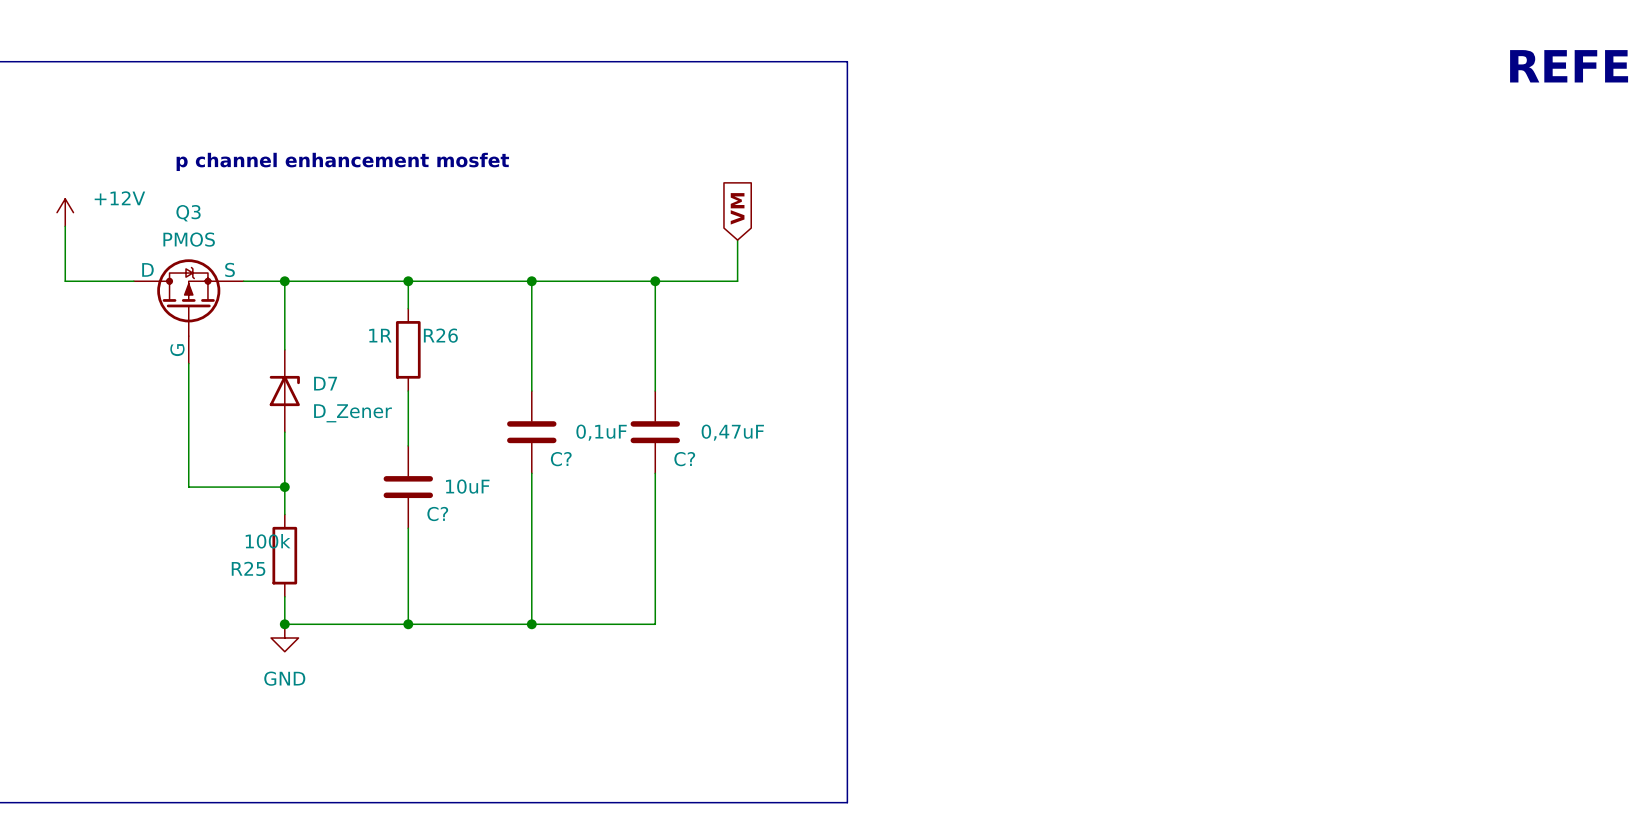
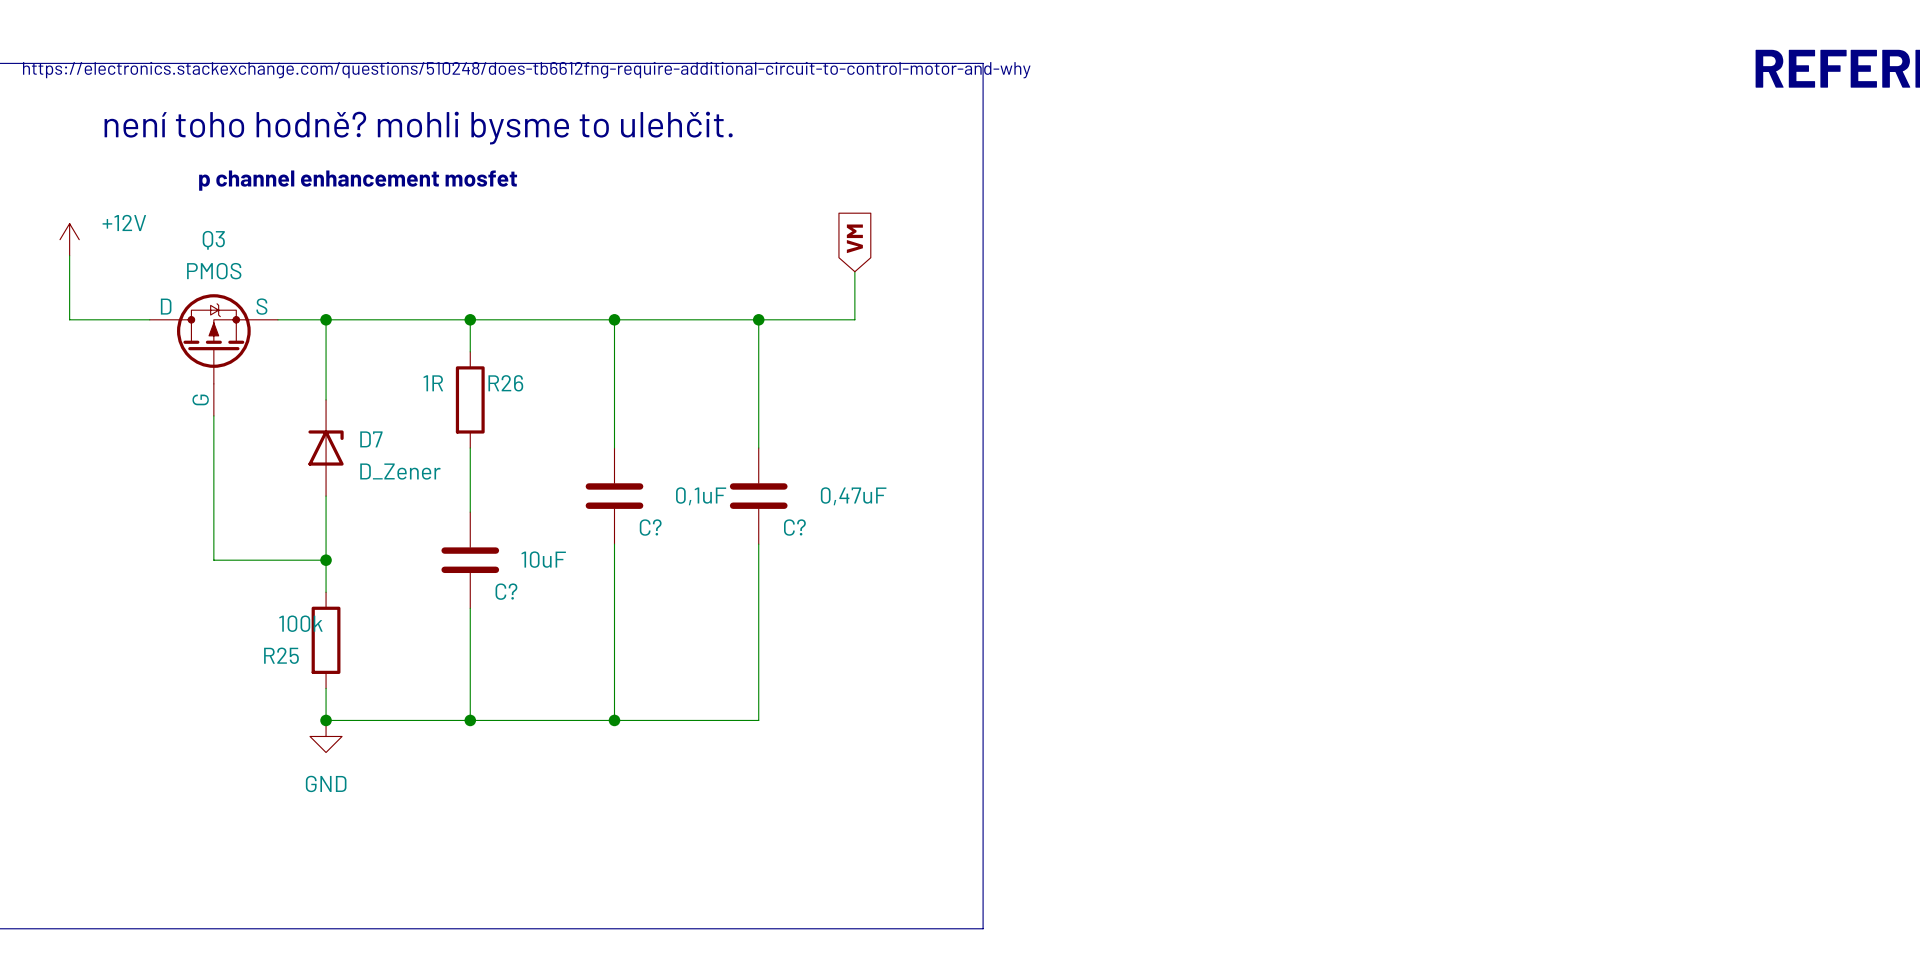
text: none -> https://electronics.stackexchange.com/questions/510248/does-tb6612fng-require-additional-circuit-to-control-motor-and-why (526, 70)
text: none -> není toho hodně? mohli bysme to ulehčit. (418, 128)

